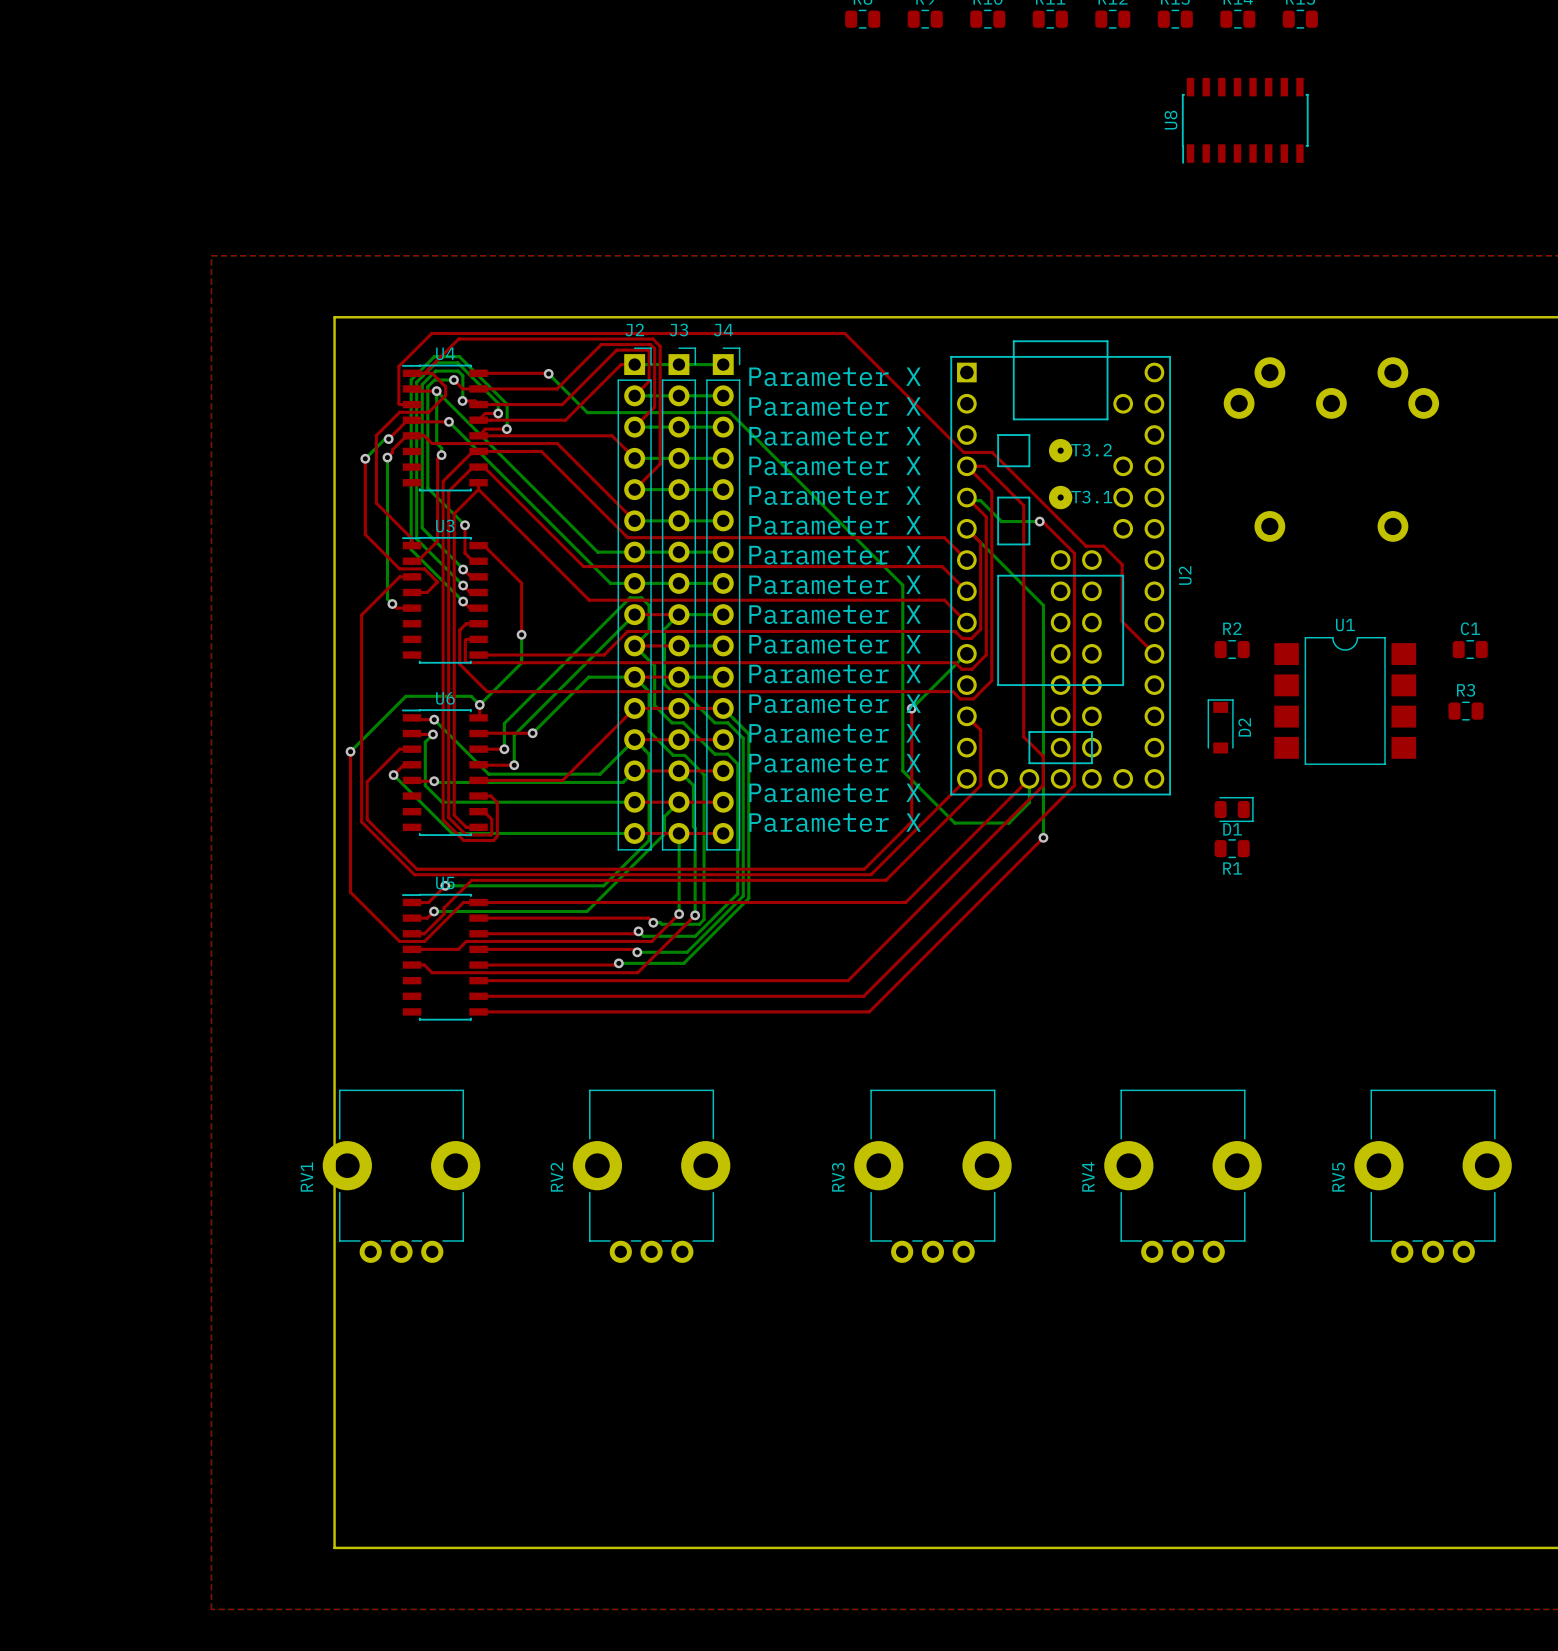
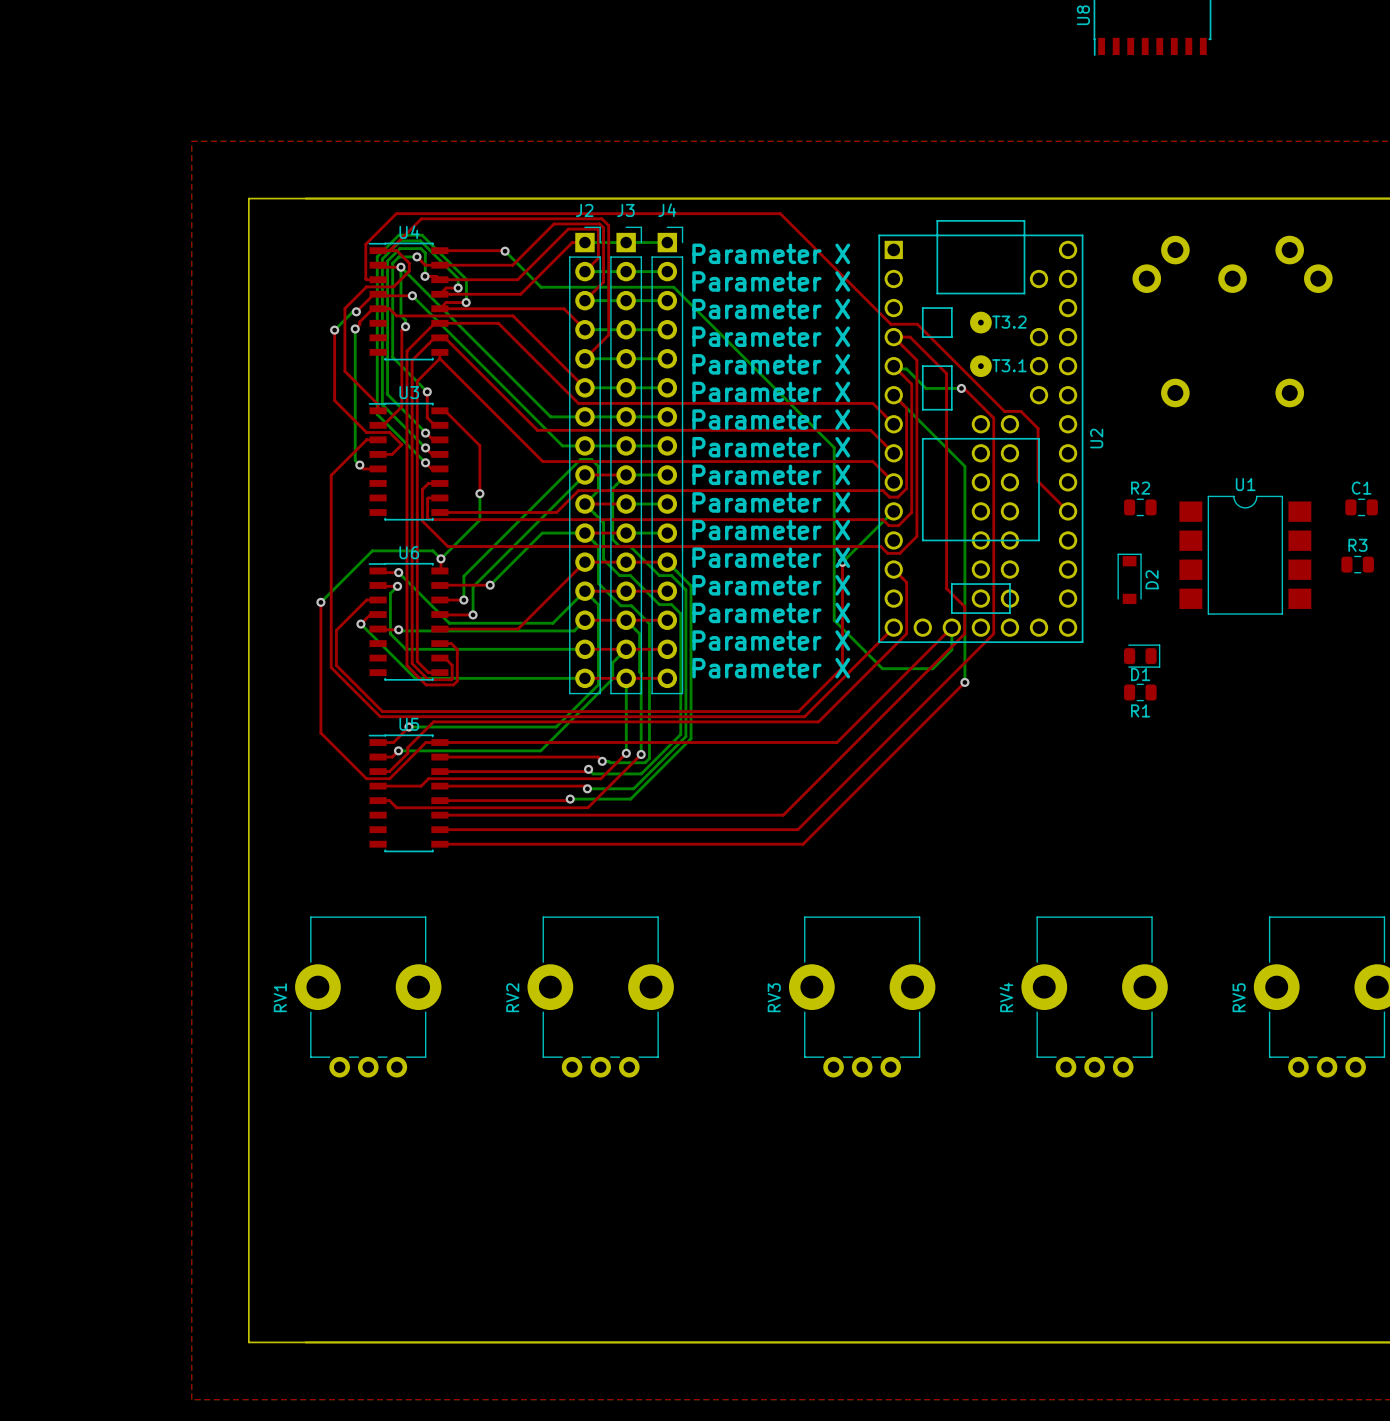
board edge: (334, 317) (334, 1547) -> (306, 198) (248, 198) (248, 1342) (306, 1342)

